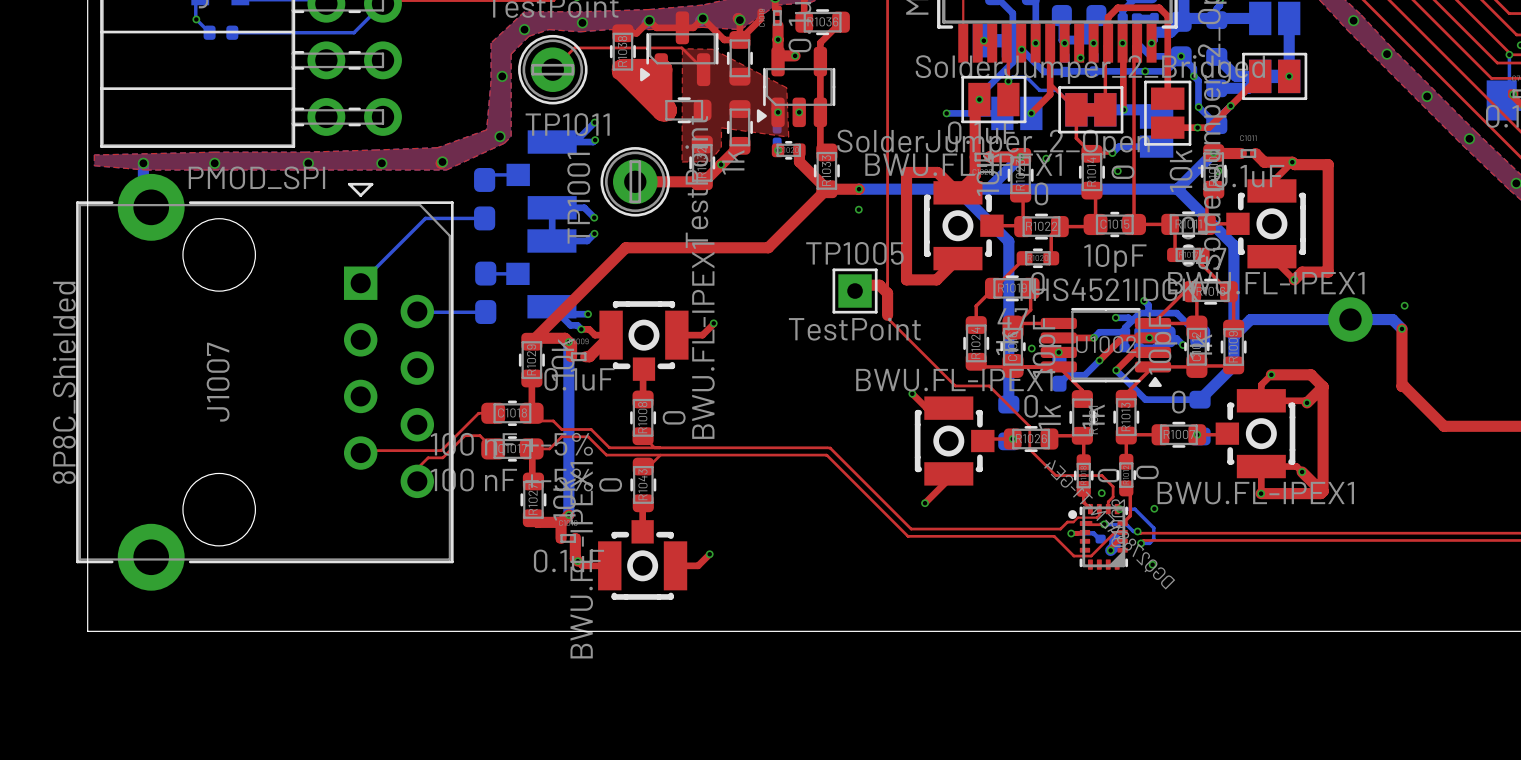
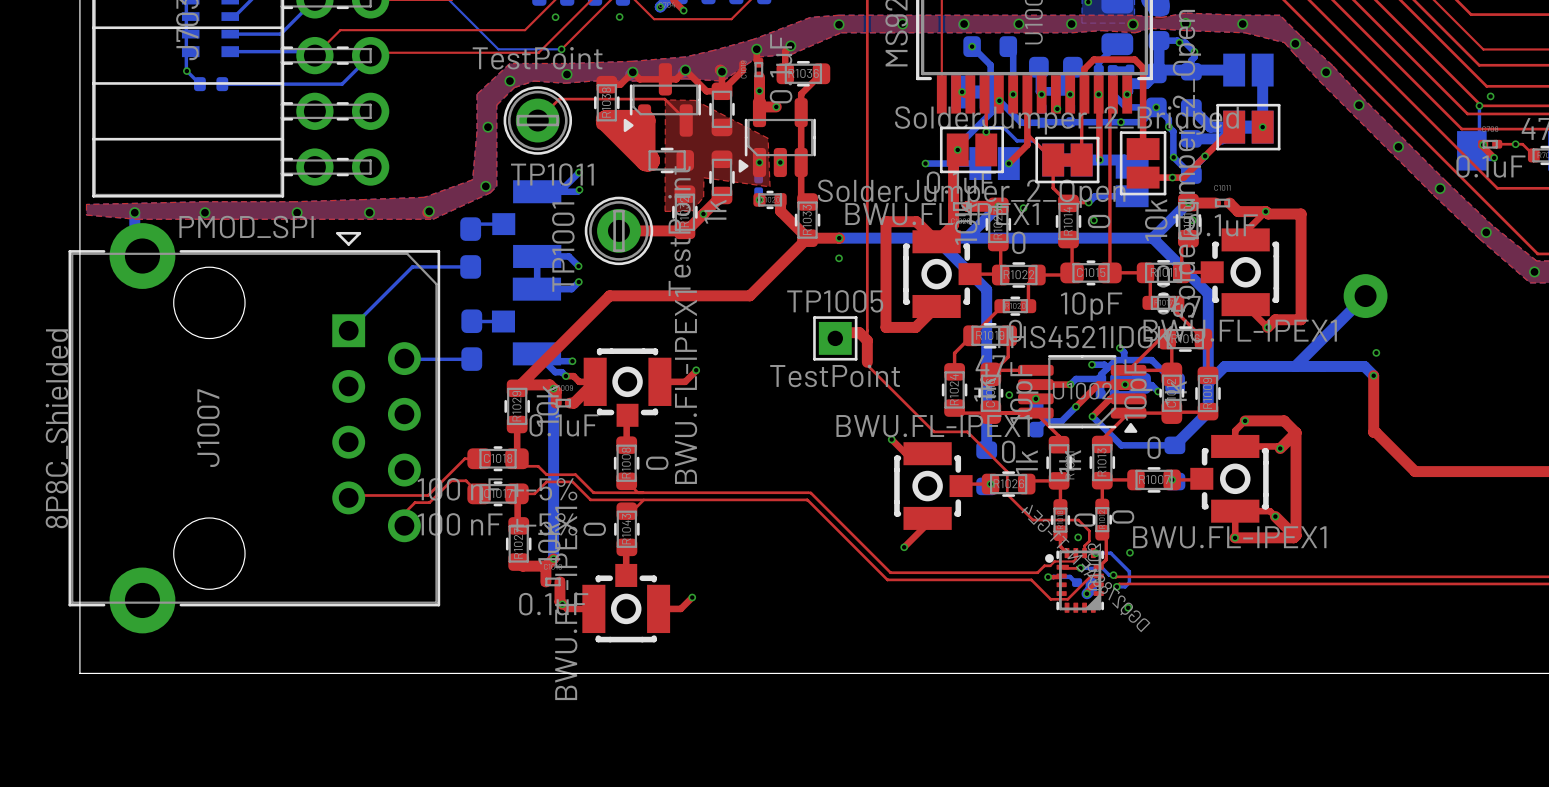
bottom track: none -> (1365, 296) (1295, 366)
part position: (1350, 319) -> (1365, 296)

